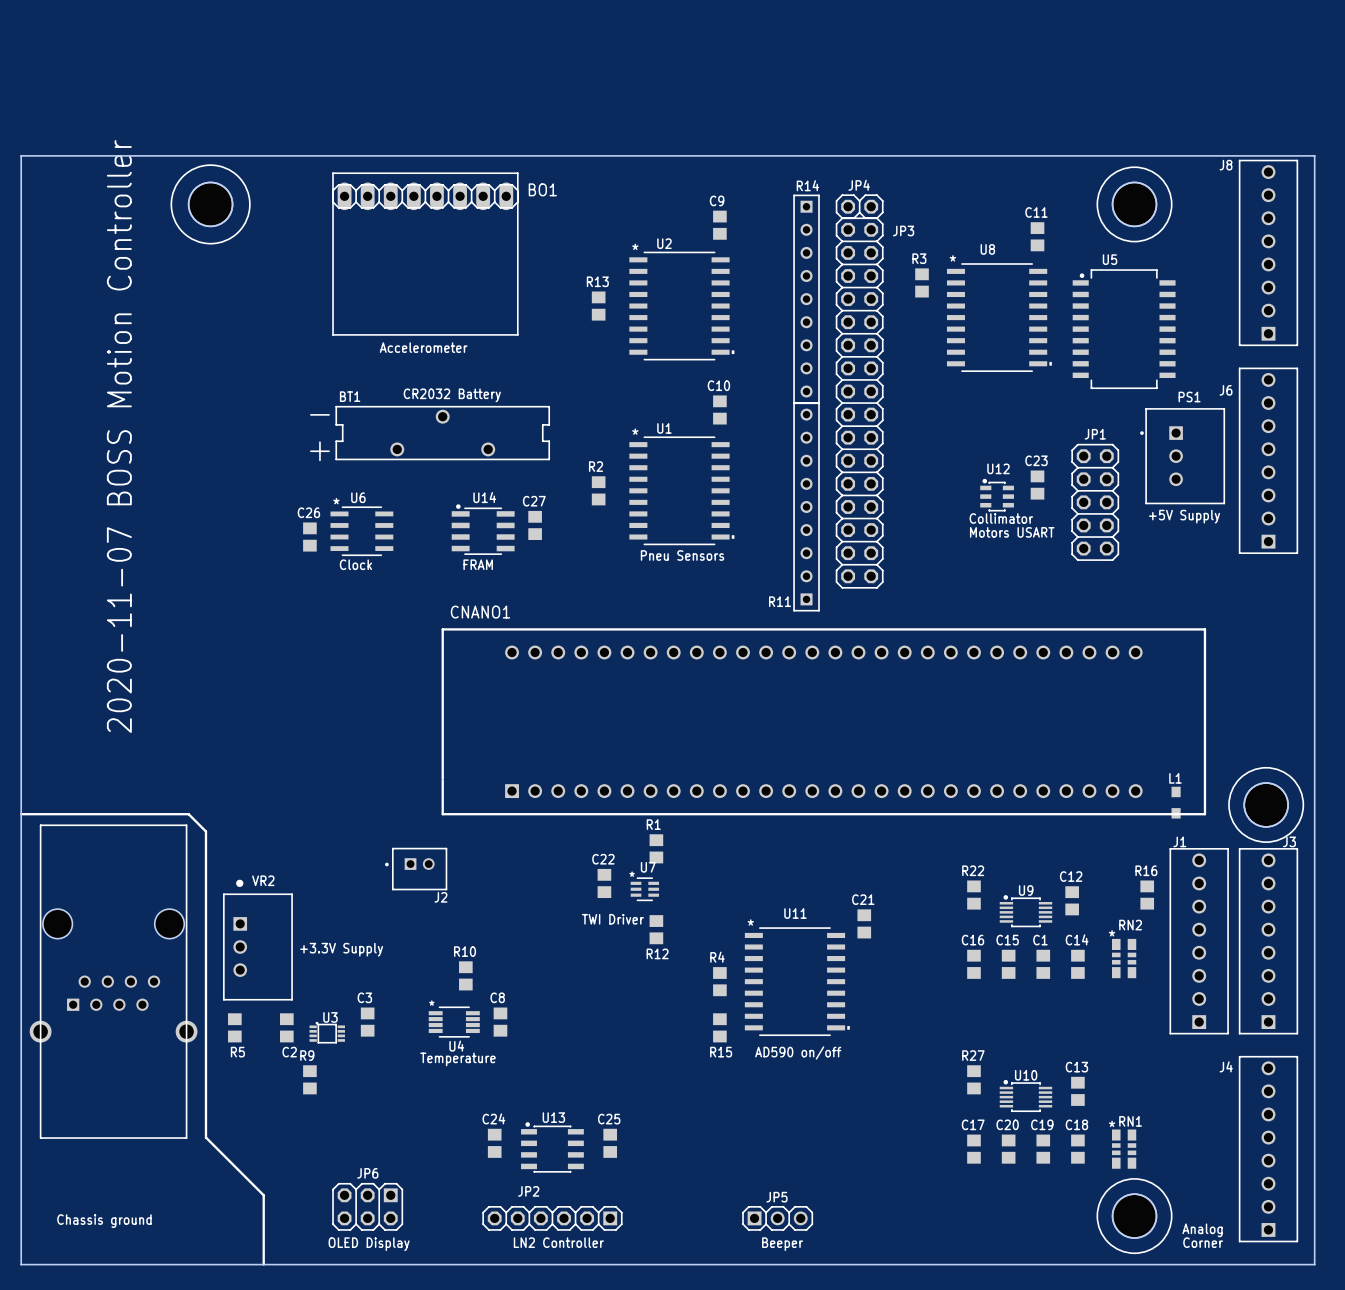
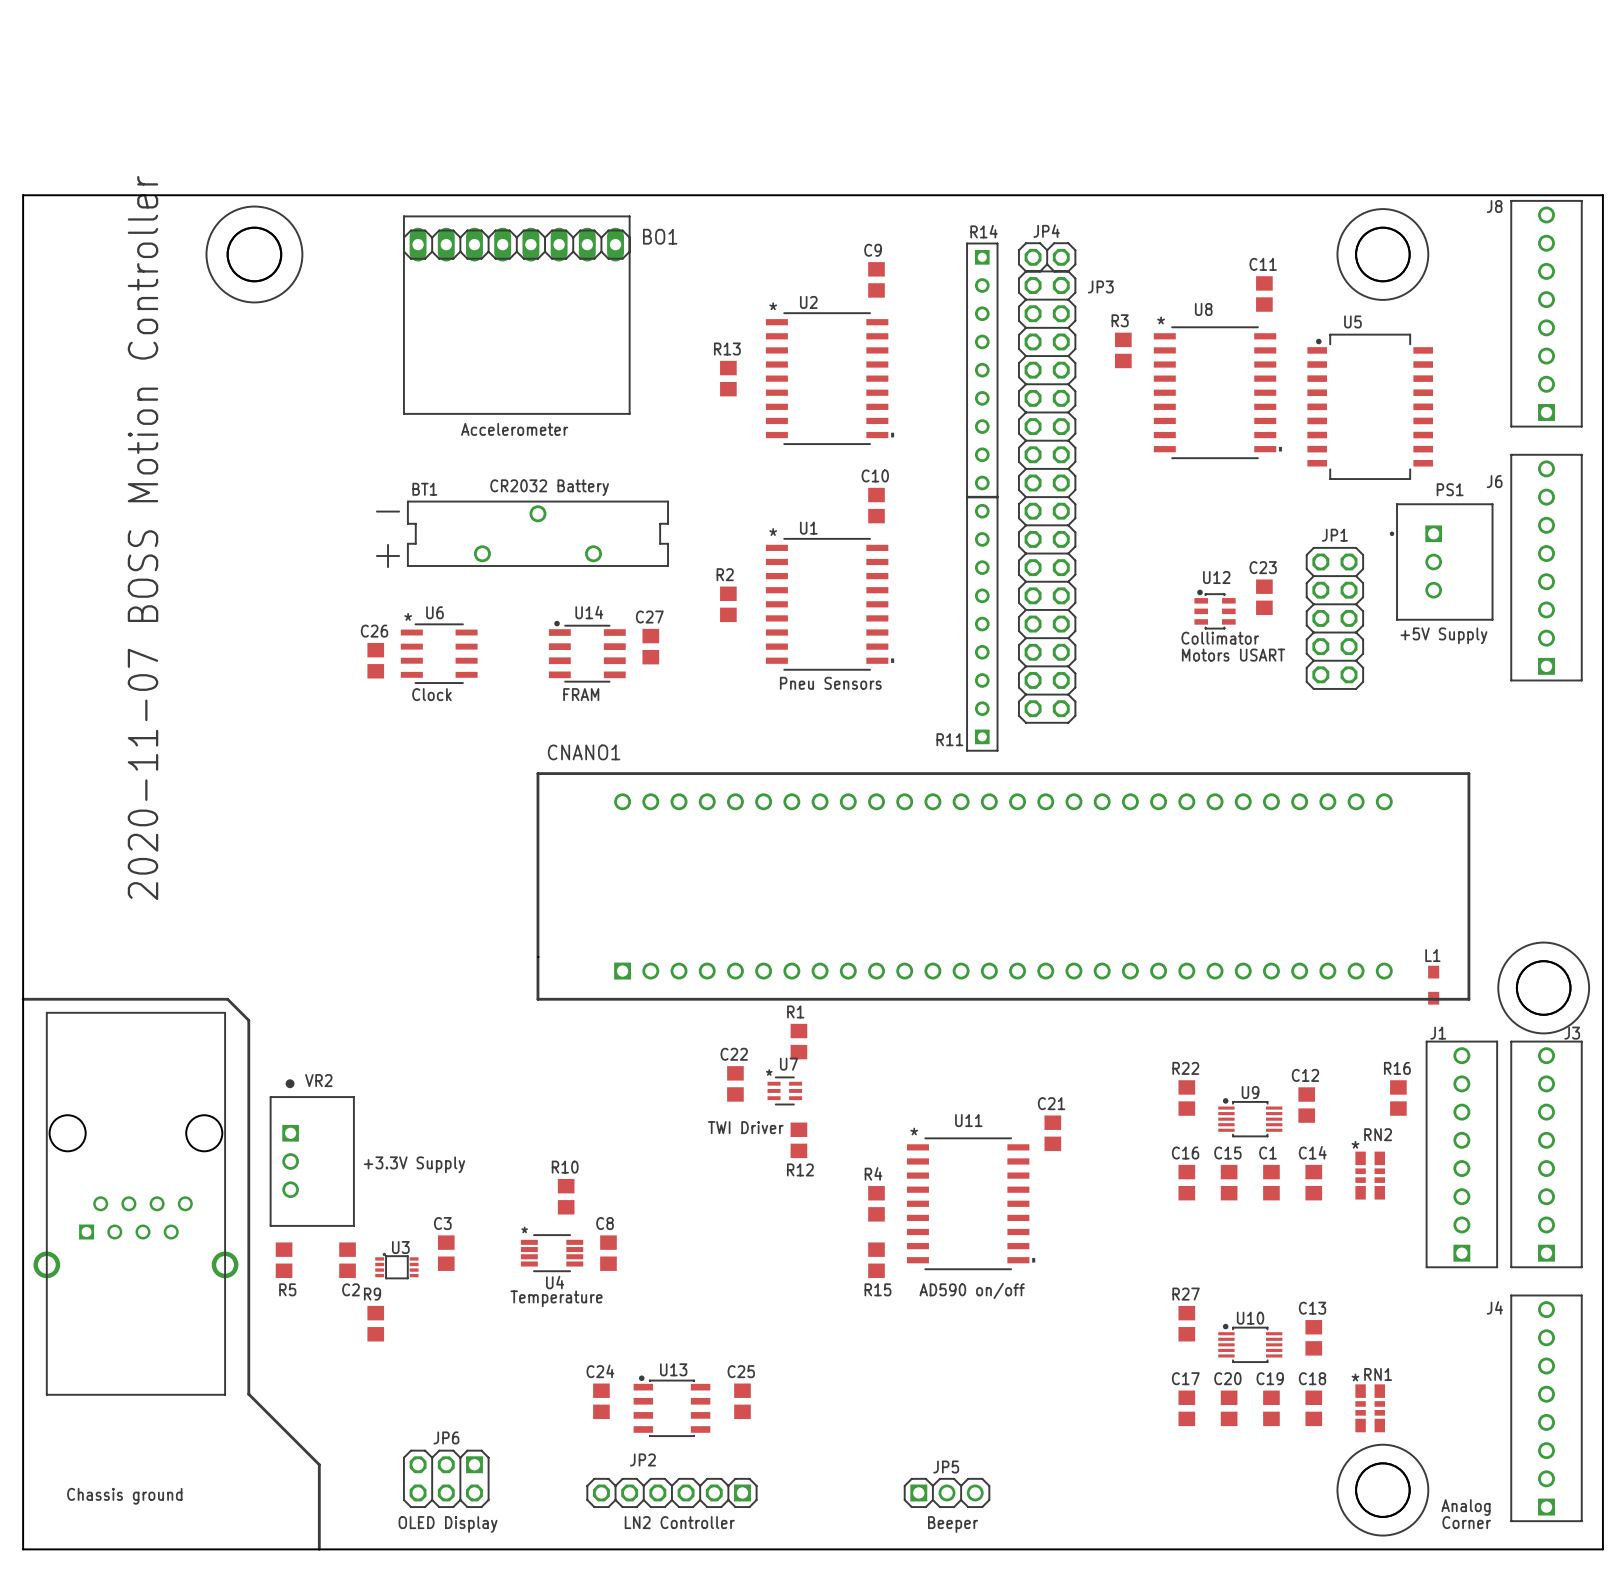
J2: (416, 869) -> none

